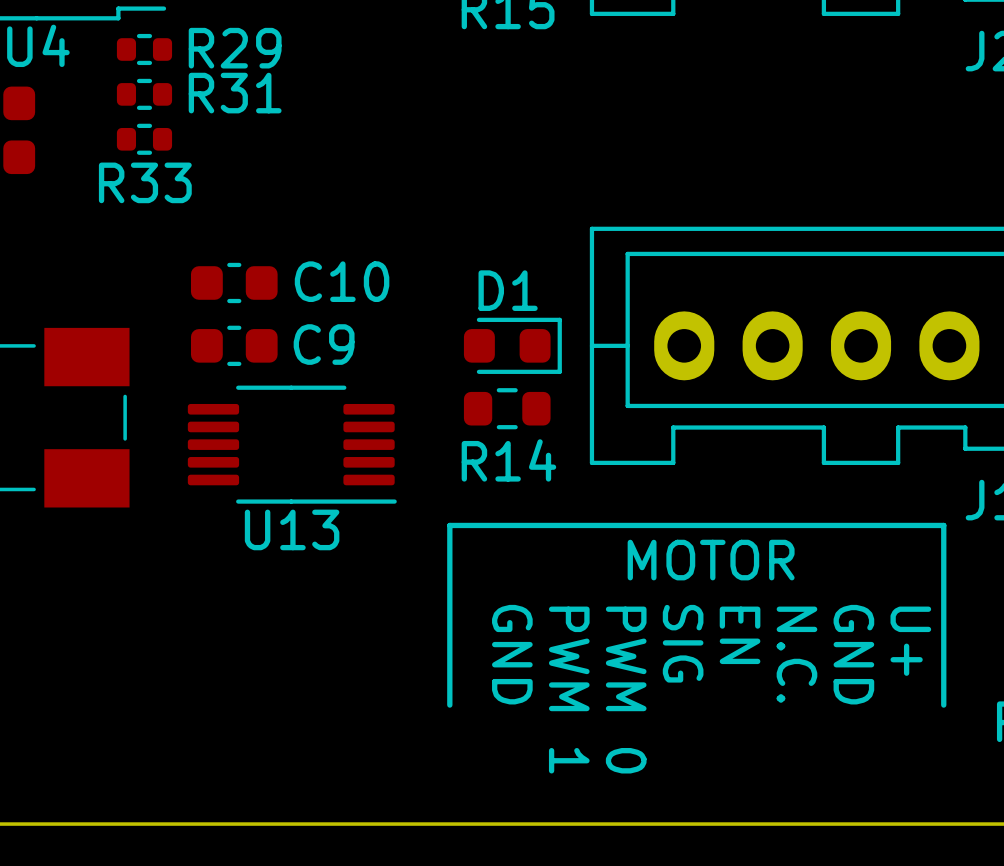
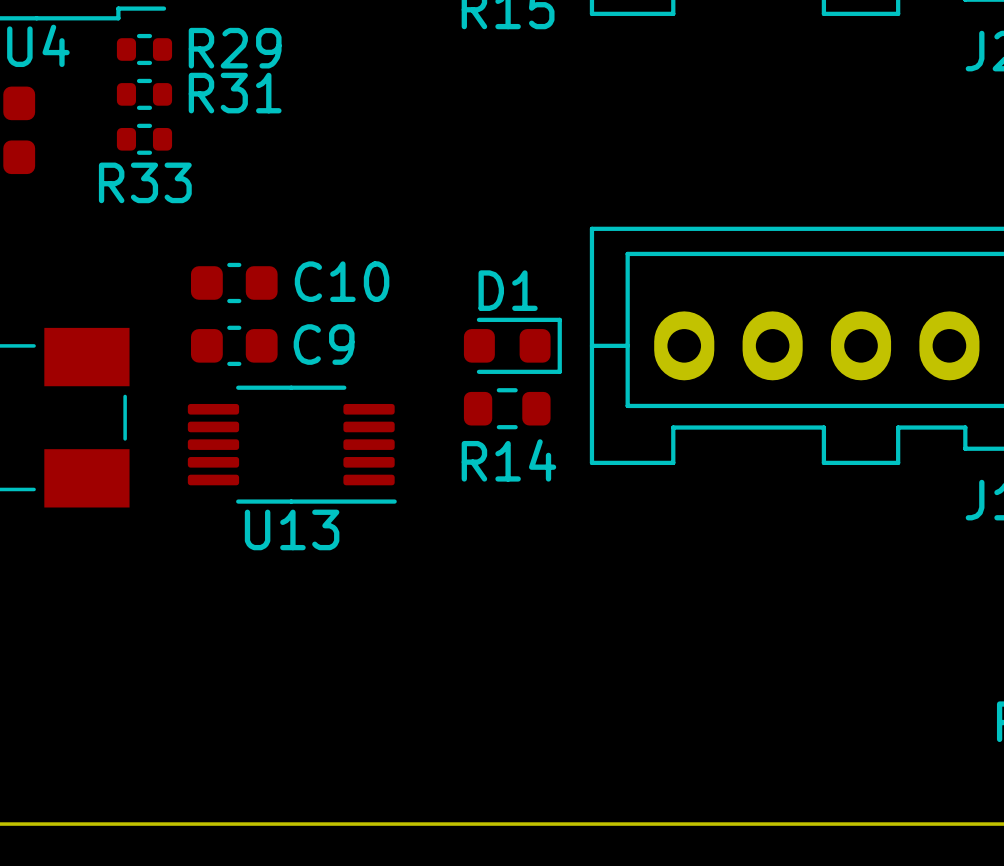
text: MOTOR (711, 560) -> none
text: EN (740, 635) -> none
text: U+ (910, 641) -> none
text: SIG (683, 643) -> none
text: GND (512, 654) -> none
text: N.C. (796, 654) -> none
text: GND (853, 654) -> none
text: PWM 1 (569, 690) -> none
text: PWM 0 (626, 690) -> none
line: (449, 705) (449, 525) (943, 525) (943, 705) -> none

